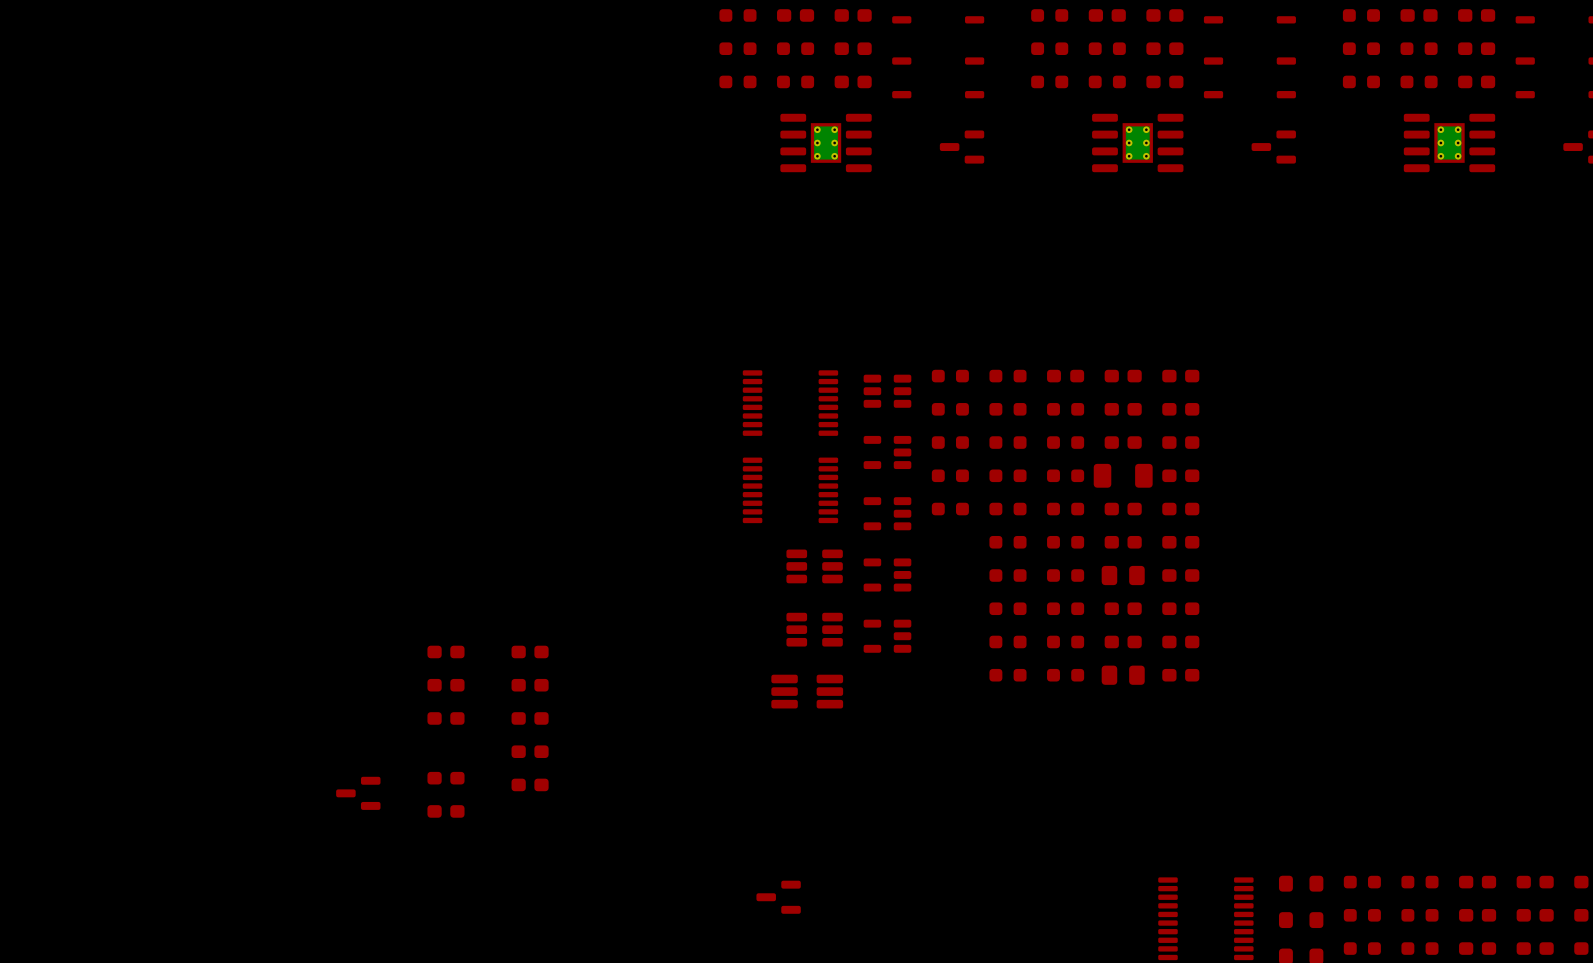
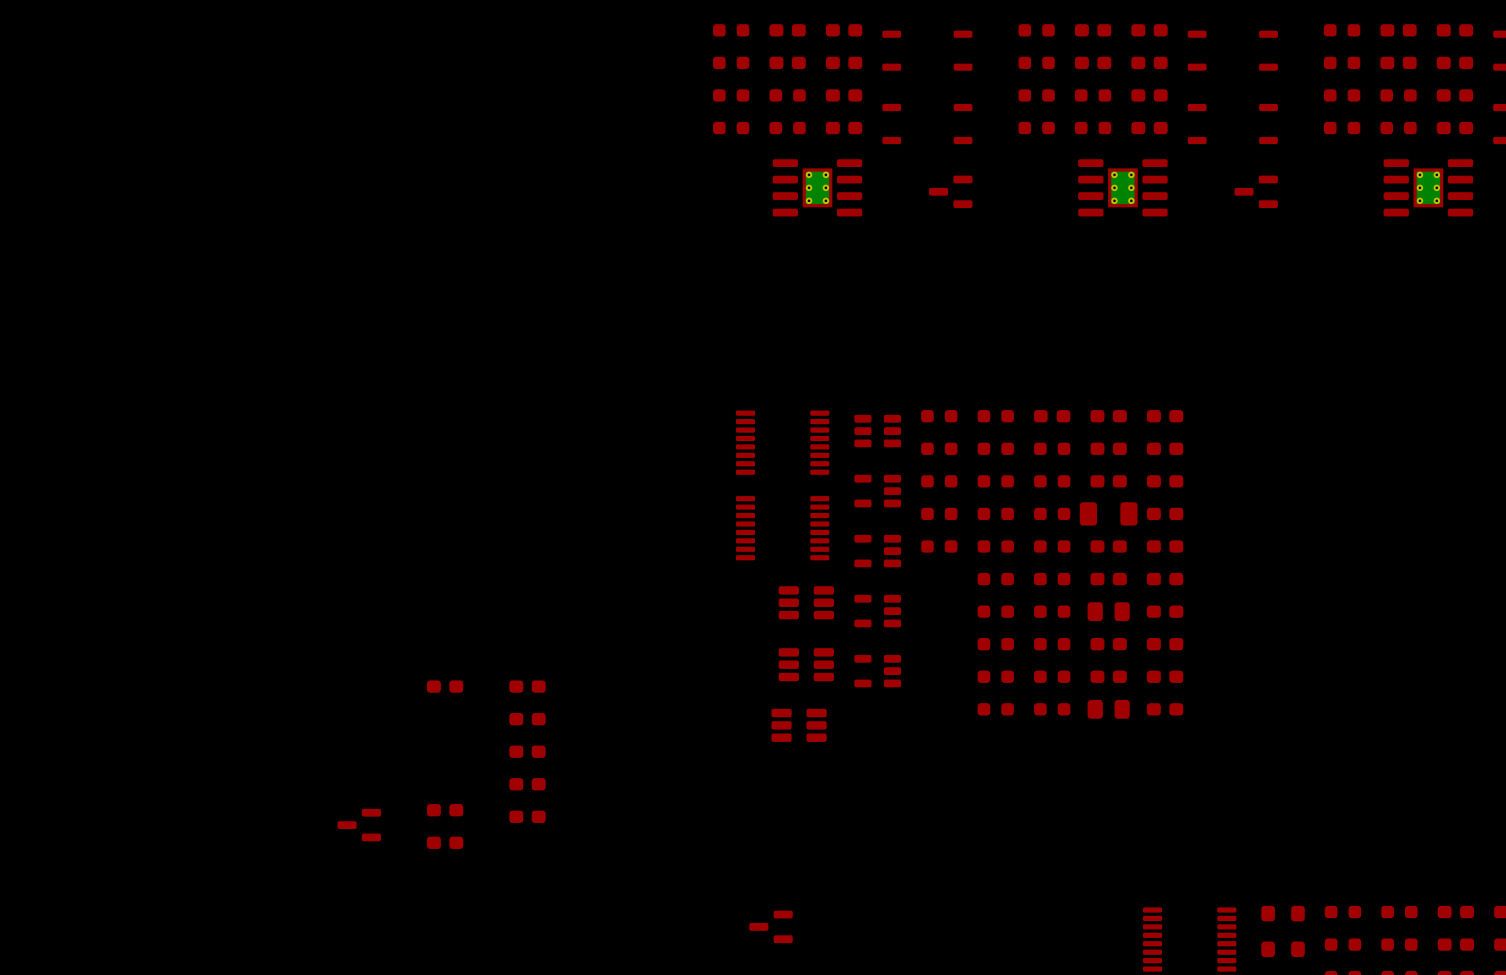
part footprint: [771, 674, 844, 709] -> [771, 708, 827, 742]
part: (445, 685) -> none
part: (445, 718) -> none

